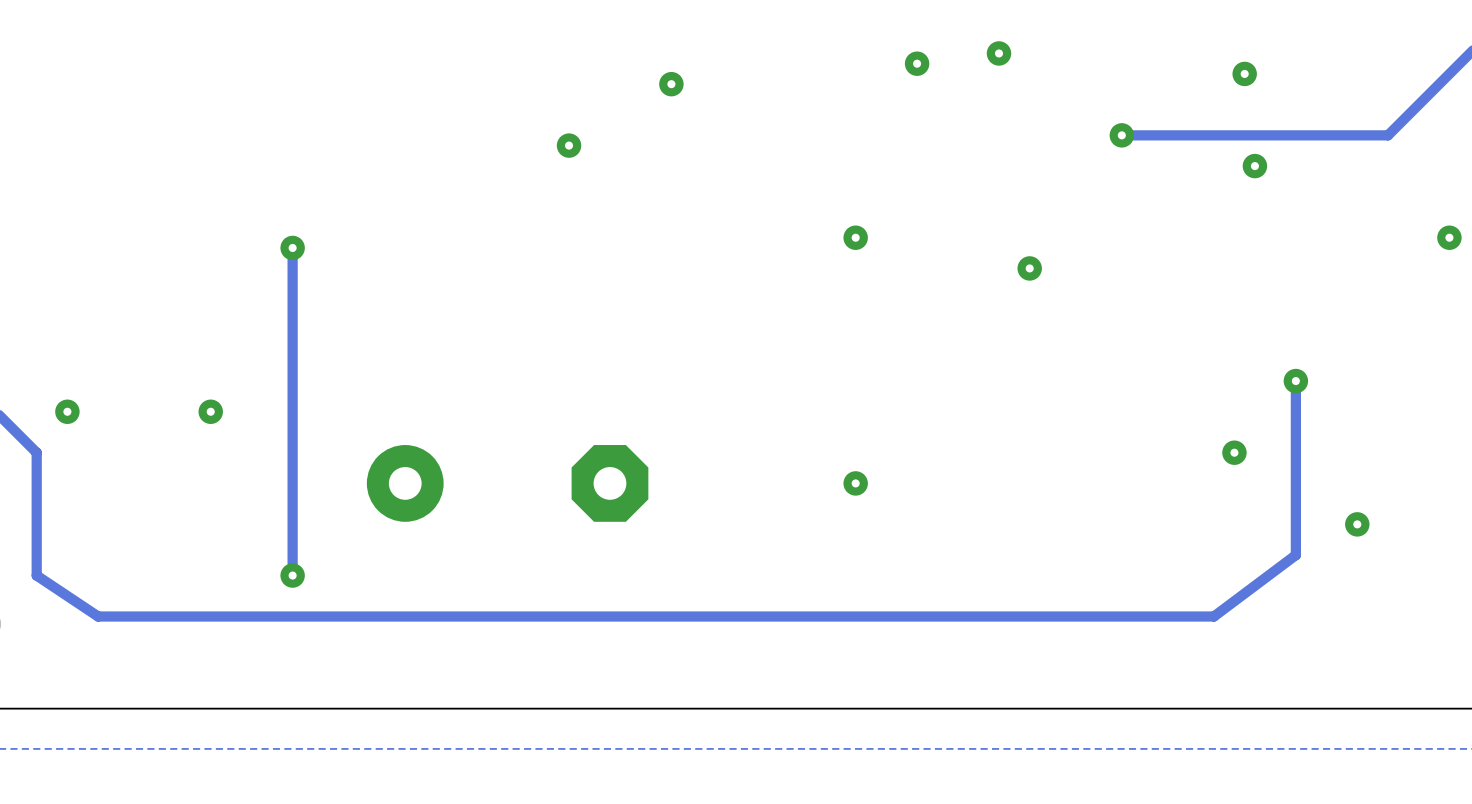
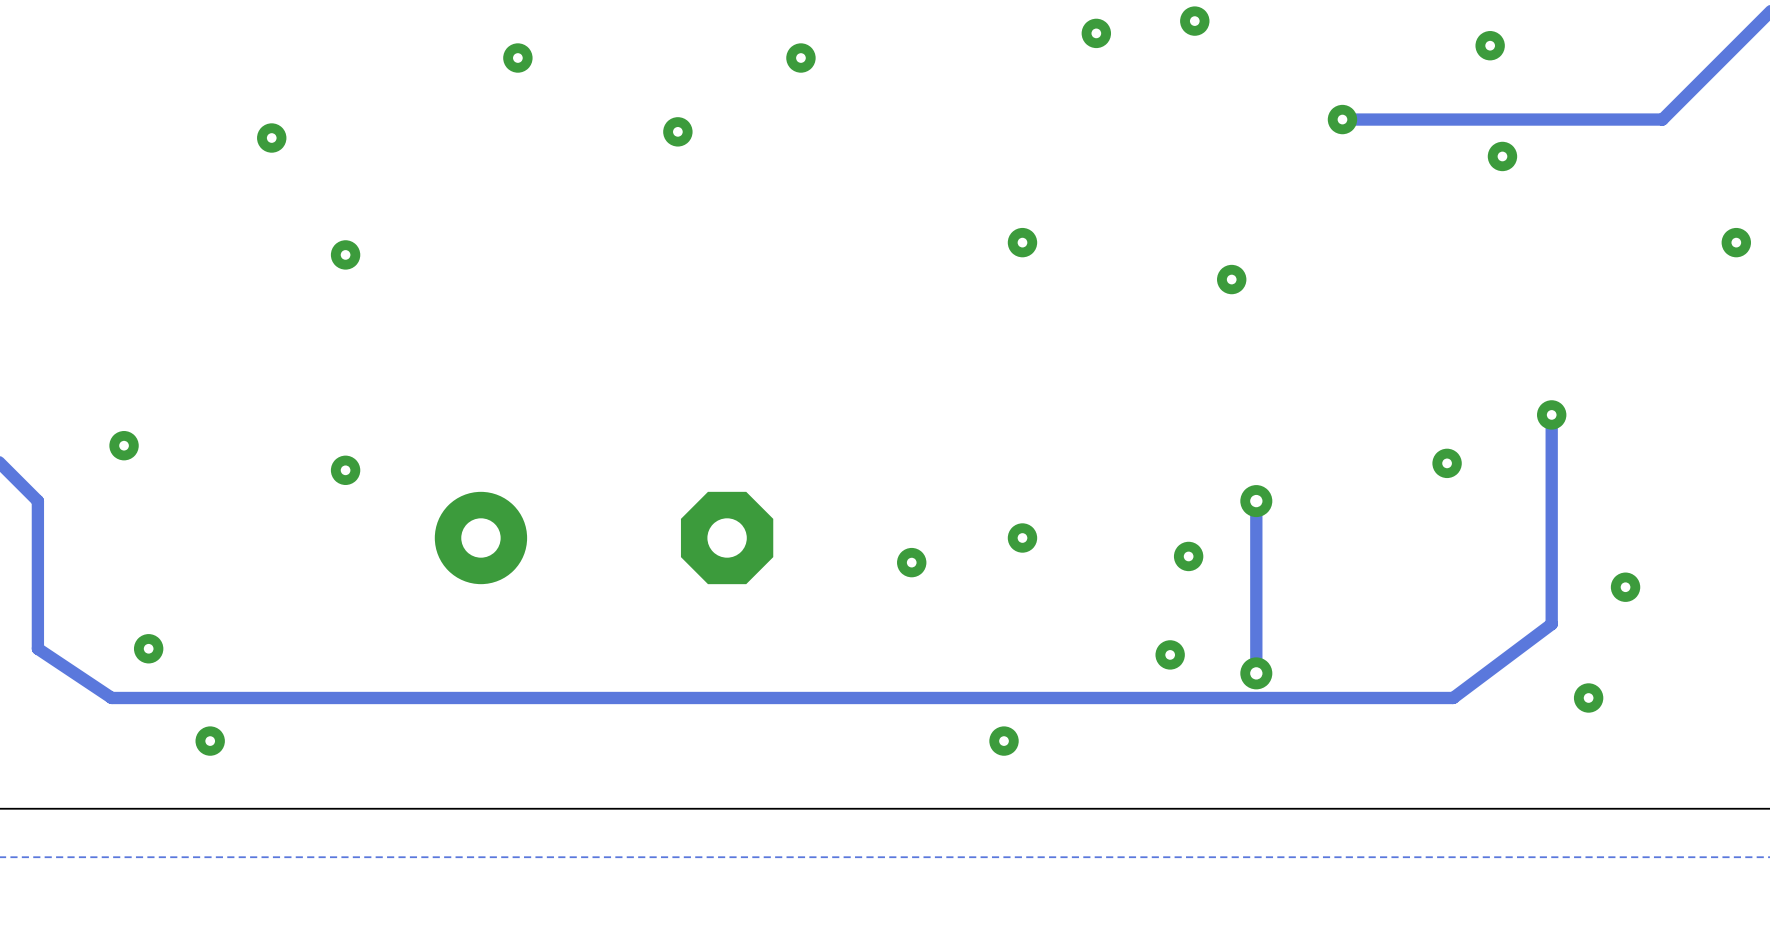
via: none -> (517, 58)
via: none -> (271, 138)
track: (292, 247) (292, 575) -> none
via position: (67, 411) -> (124, 445)
via: (210, 411) -> none
via: none -> (345, 470)
track: none -> (1256, 501) (1256, 673)
via: none -> (1256, 501)
via position: (1234, 452) -> (1447, 463)
via: none -> (1188, 556)
via: none -> (911, 562)
via: none -> (148, 648)
via: (292, 575) -> none
via: none -> (1170, 654)
via: none -> (1256, 673)
via: none -> (1588, 697)
via: none -> (210, 741)
via: none -> (1004, 741)

